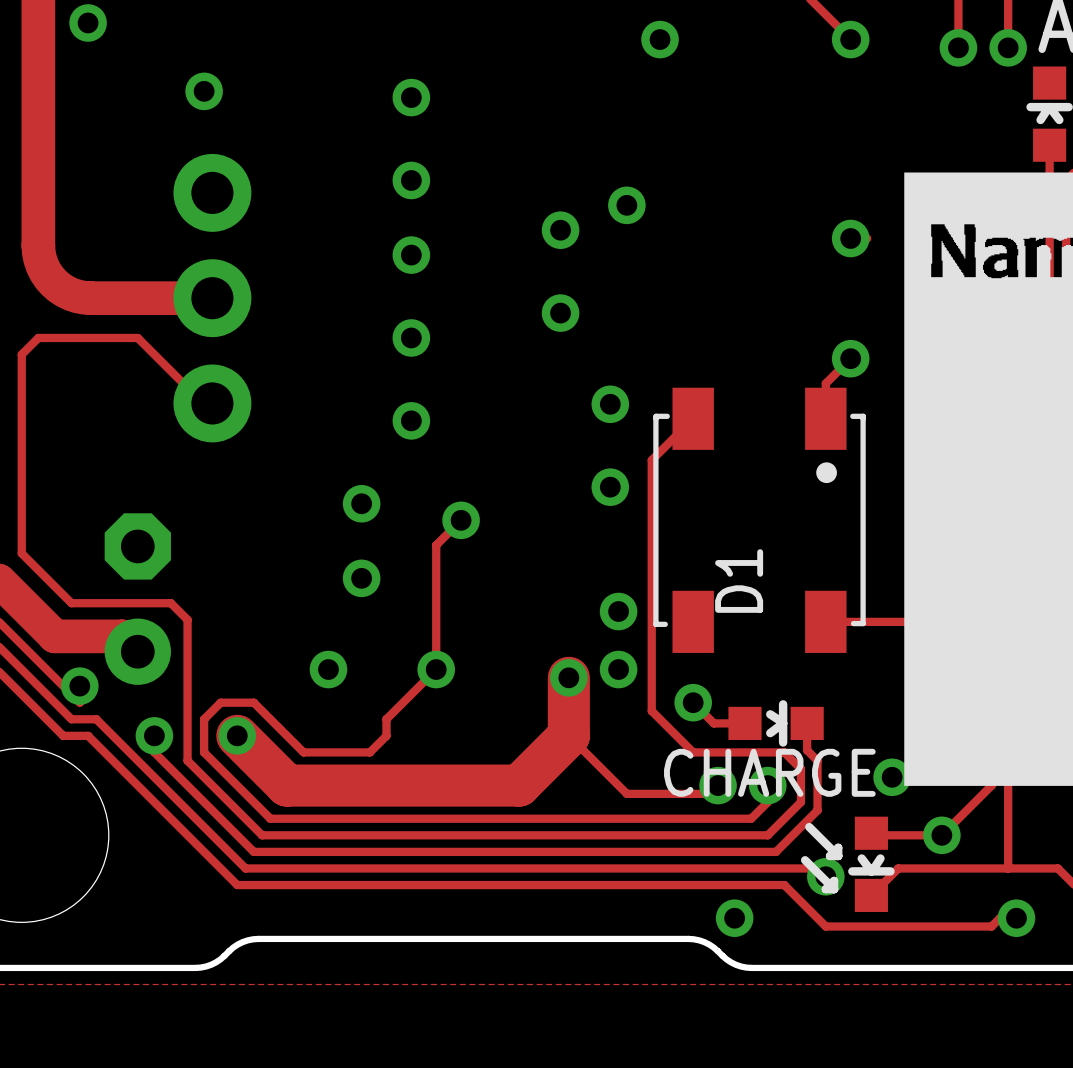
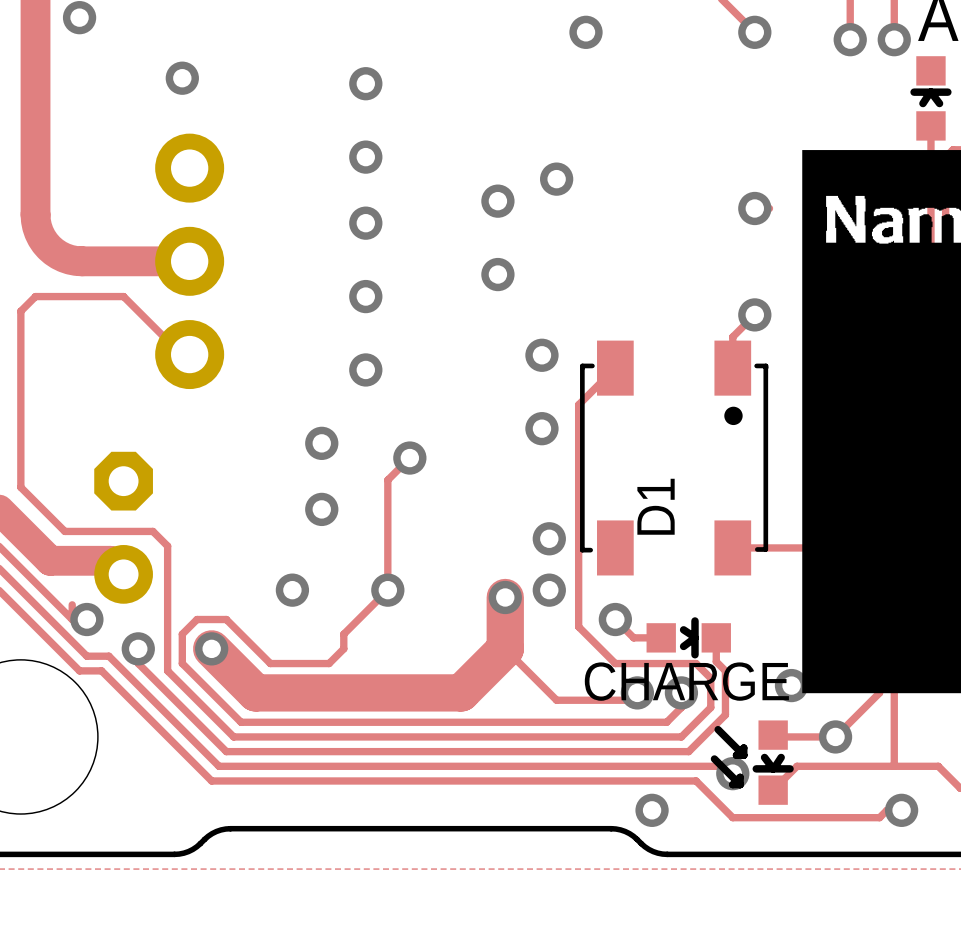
via position: (79, 686) -> (86, 619)
track: (71, 719) (96, 719) (121, 744) -> none
track: (63, 735) (88, 735) -> (64, 634) (79, 648)
track: none -> (57, 648) (79, 670) (101, 670)
track: (96, 744) (112, 760) -> (86, 656) (108, 656)

